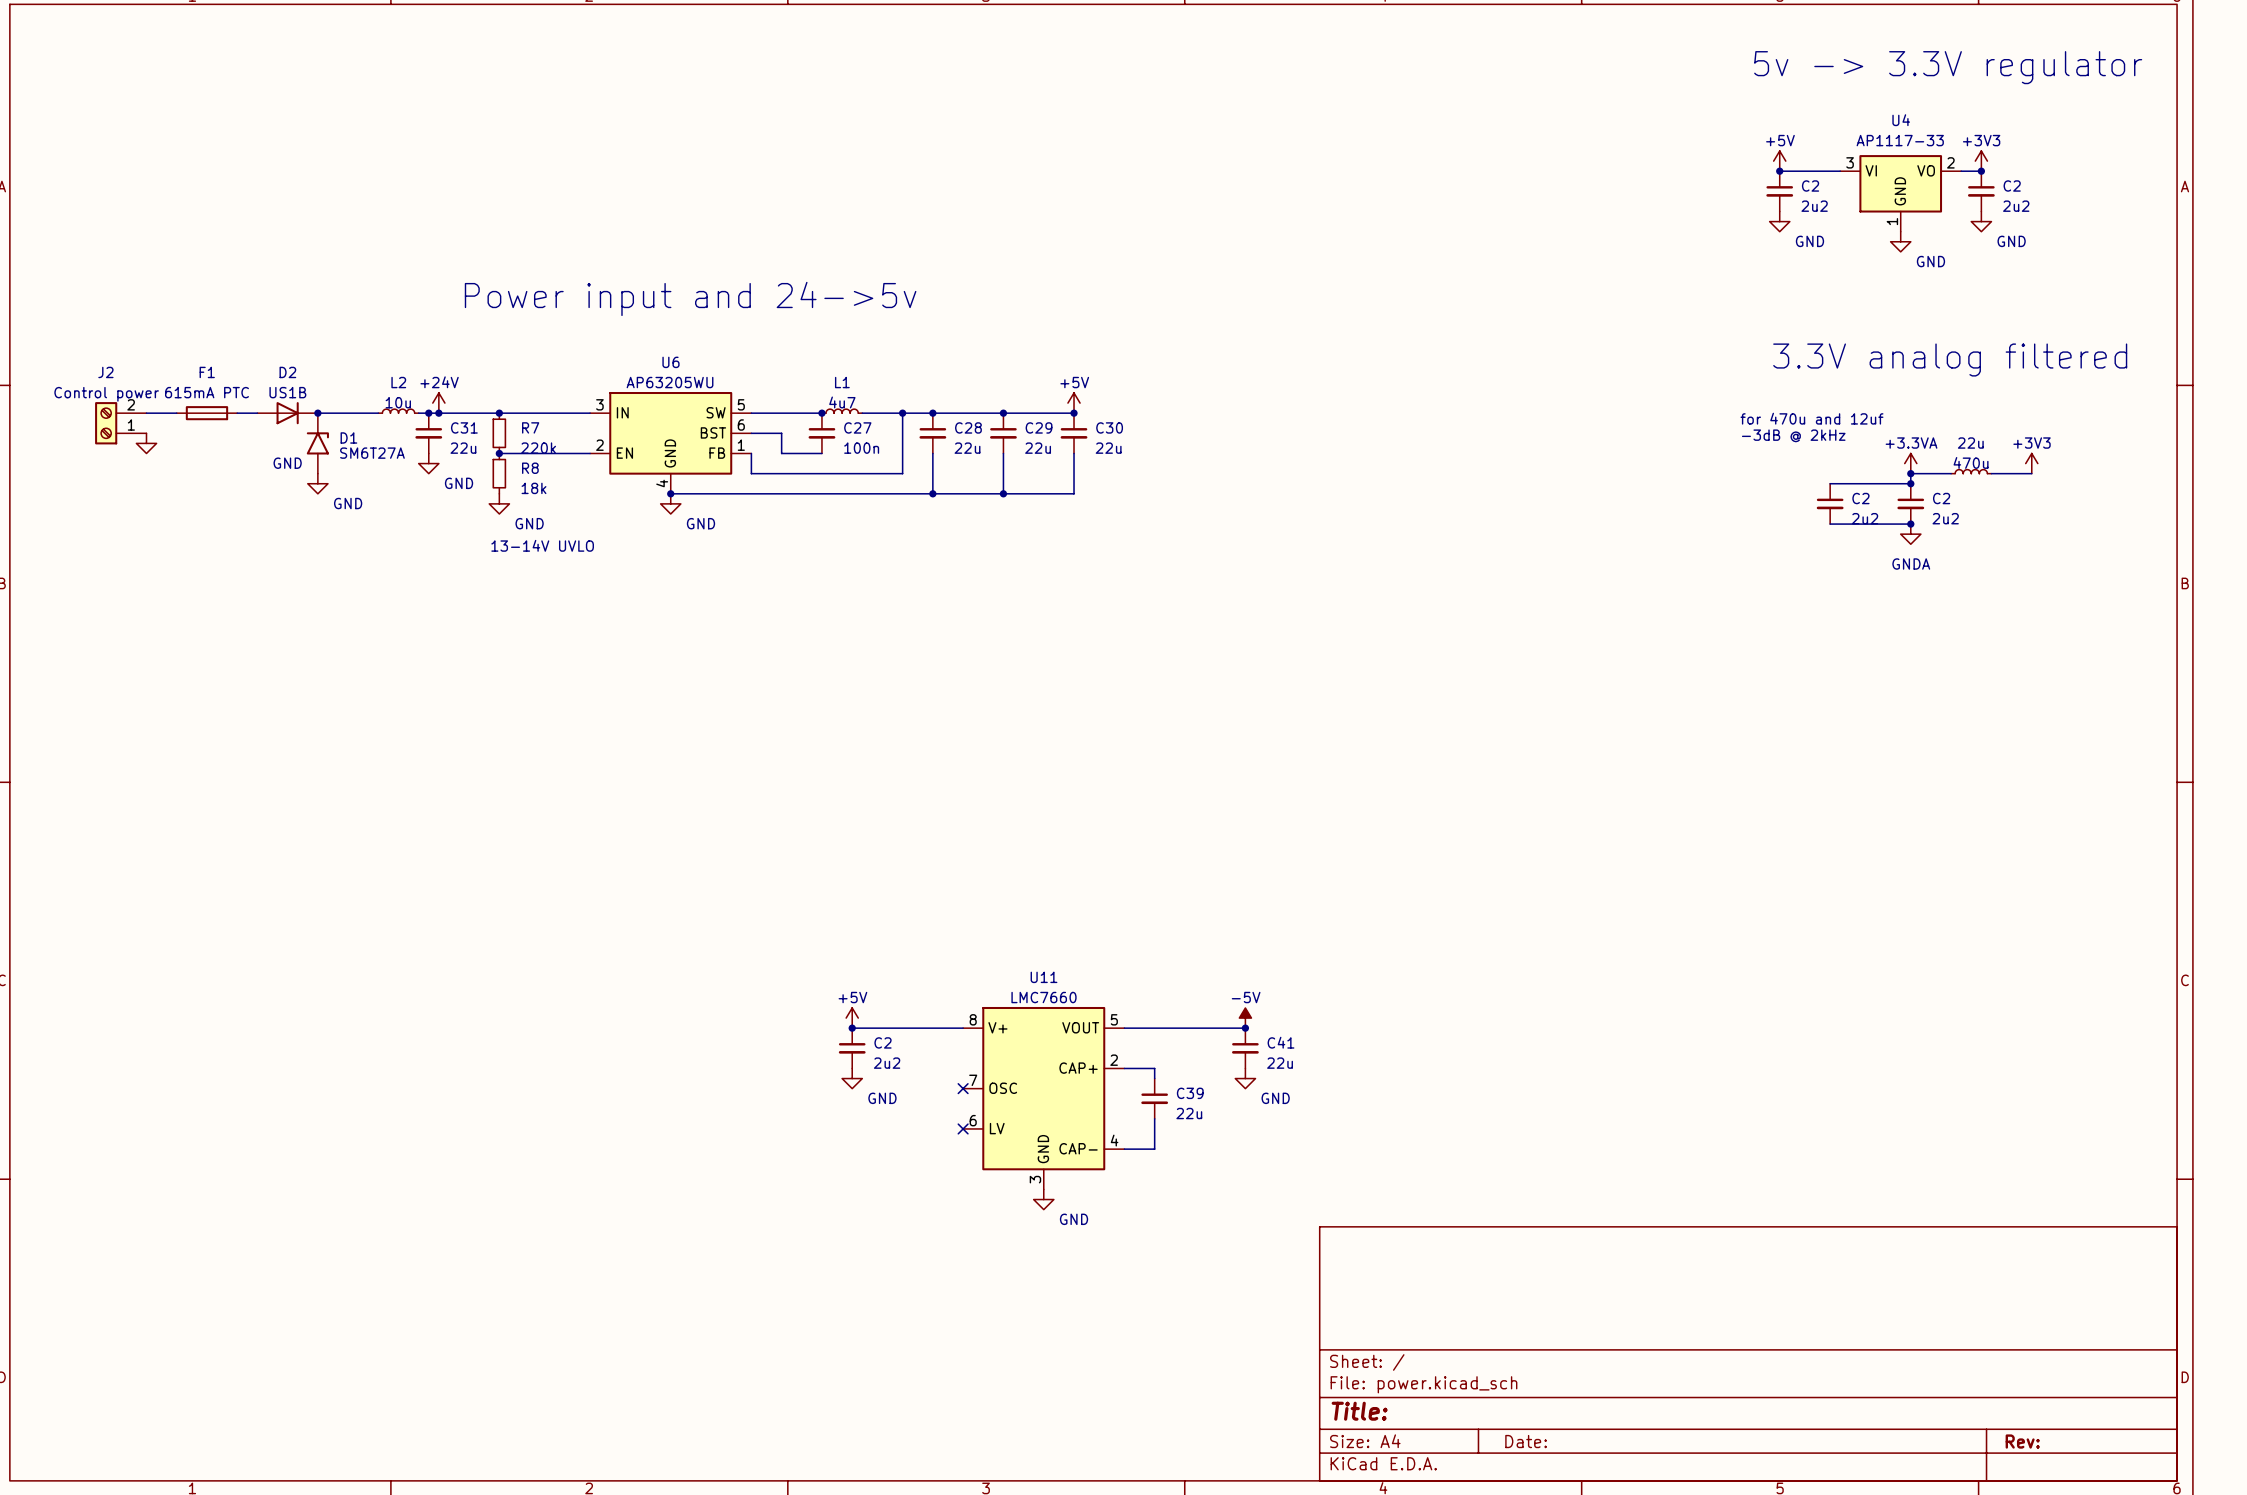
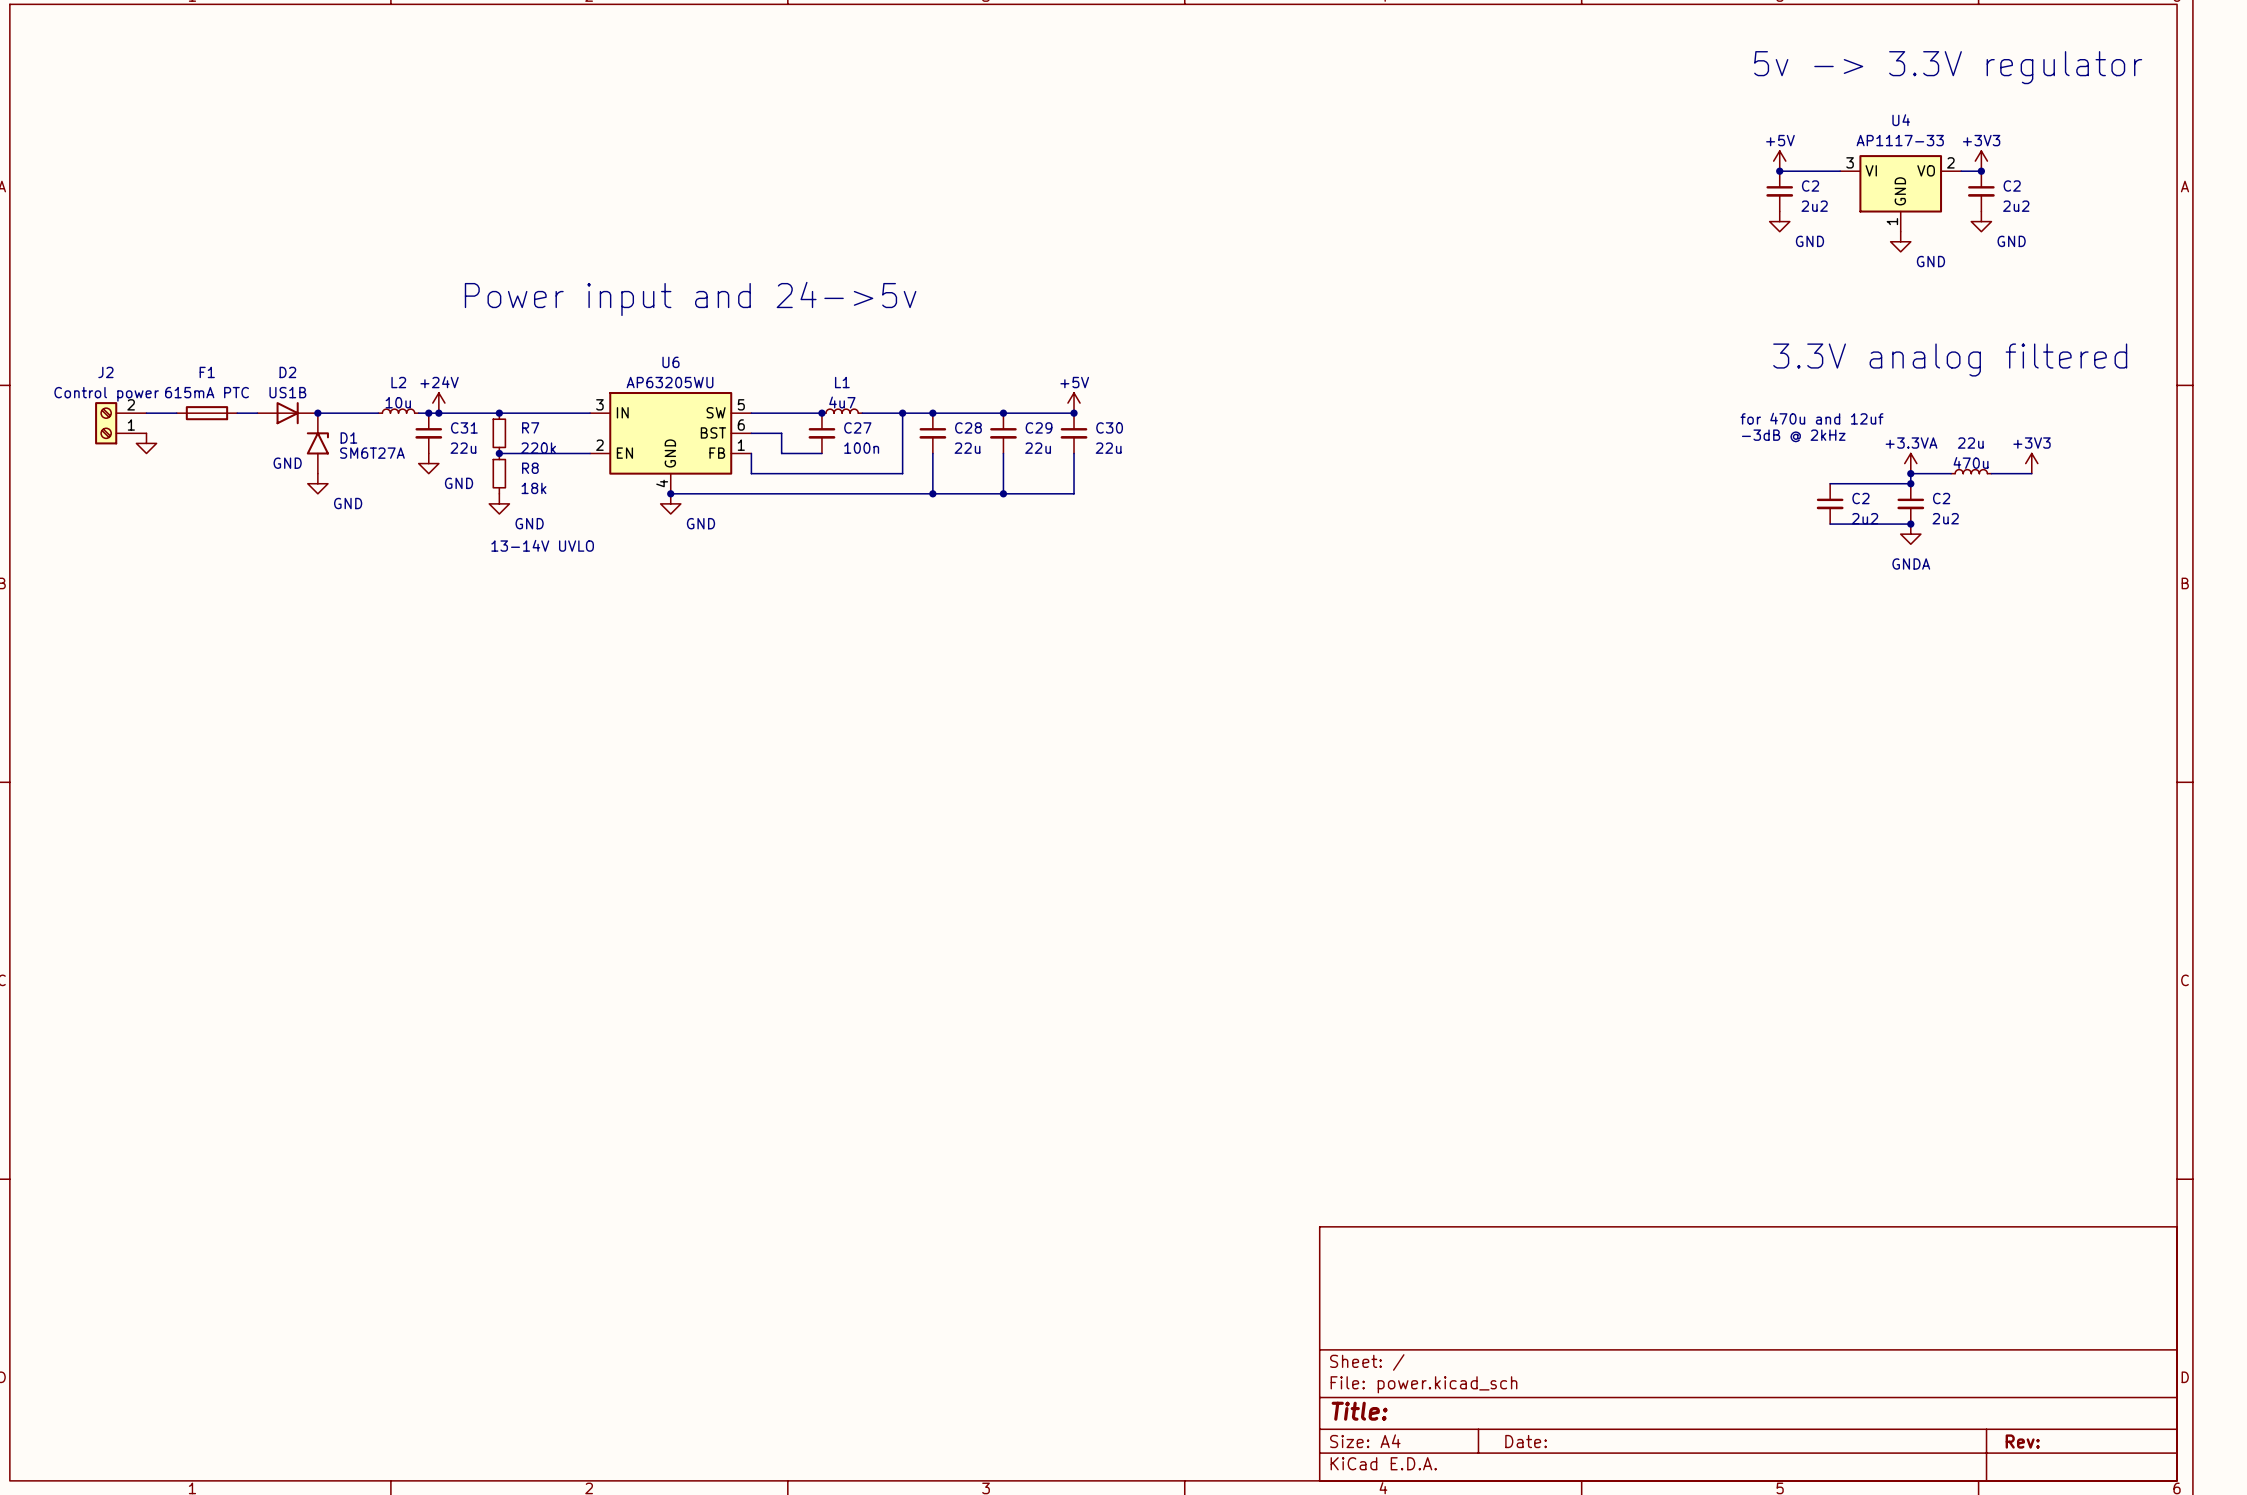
power symbol: +5V (852, 1018) -> none
power symbol: -5V (1245, 1018) -> none
wire: (852, 1028) (963, 1028) -> none
junction: (852, 1028) -> none
wire: (1124, 1028) (1245, 1028) -> none
junction: (1245, 1028) -> none
C2: 2u2 (852, 1048) -> none
C41: 22u (1245, 1048) -> none
wire: (1124, 1068) (1154, 1068) (1154, 1078) -> none
power symbol: GND (852, 1078) -> none
power symbol: GND (1245, 1078) -> none
no-connect mark: (963, 1088) -> none
U11: LMC7660 (1043, 1098) -> none
C39: 22u (1154, 1098) -> none
wire: (1154, 1118) (1154, 1149) (1124, 1149) -> none
no-connect mark: (963, 1128) -> none
power symbol: GND (1043, 1199) -> none

